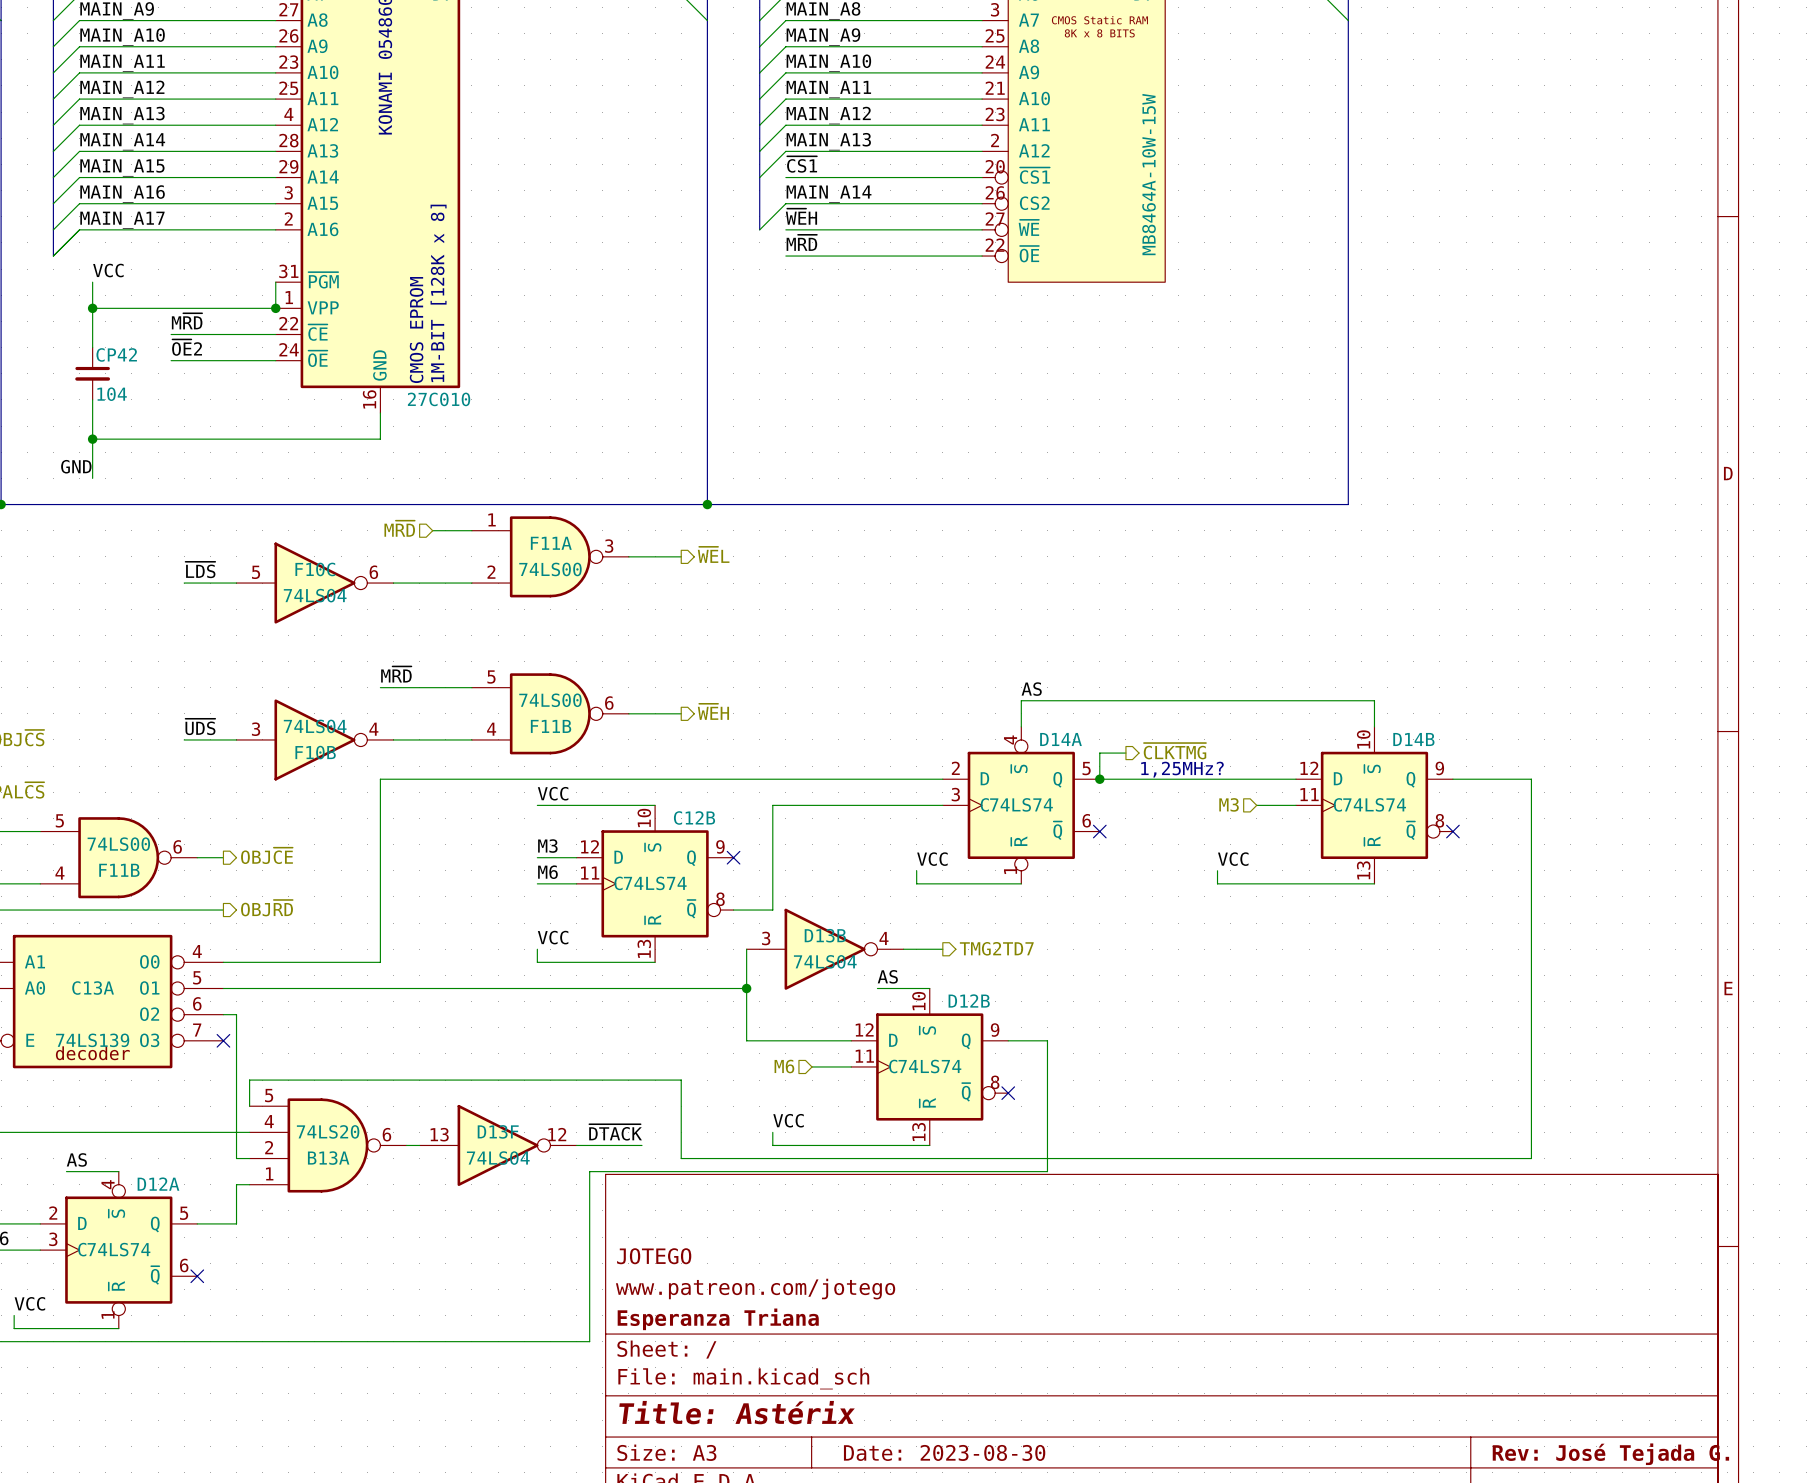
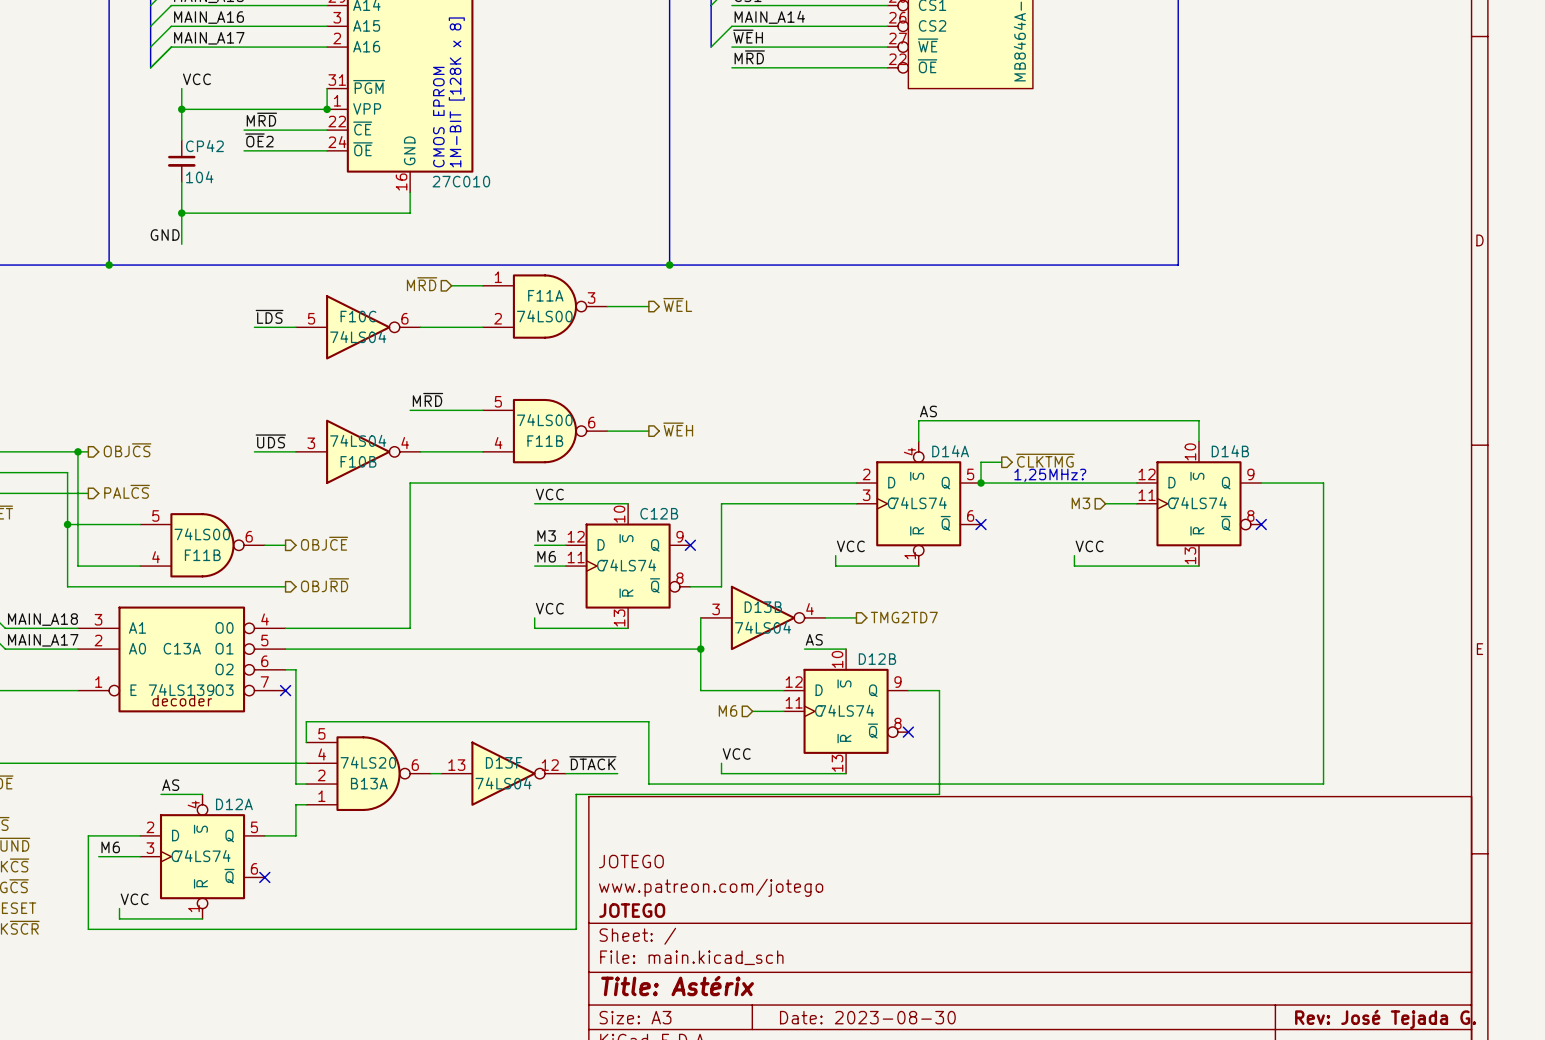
title block: Esperanza Triana (718, 1319) -> JOTEGO (632, 910)

